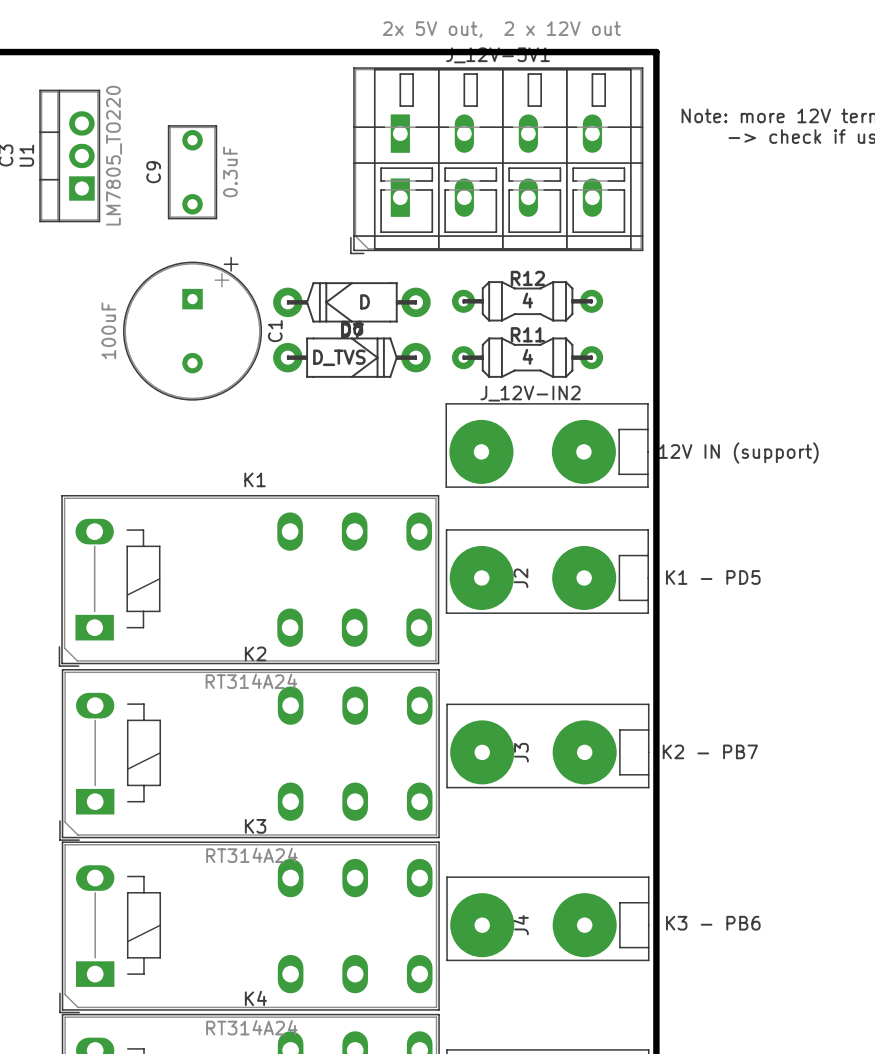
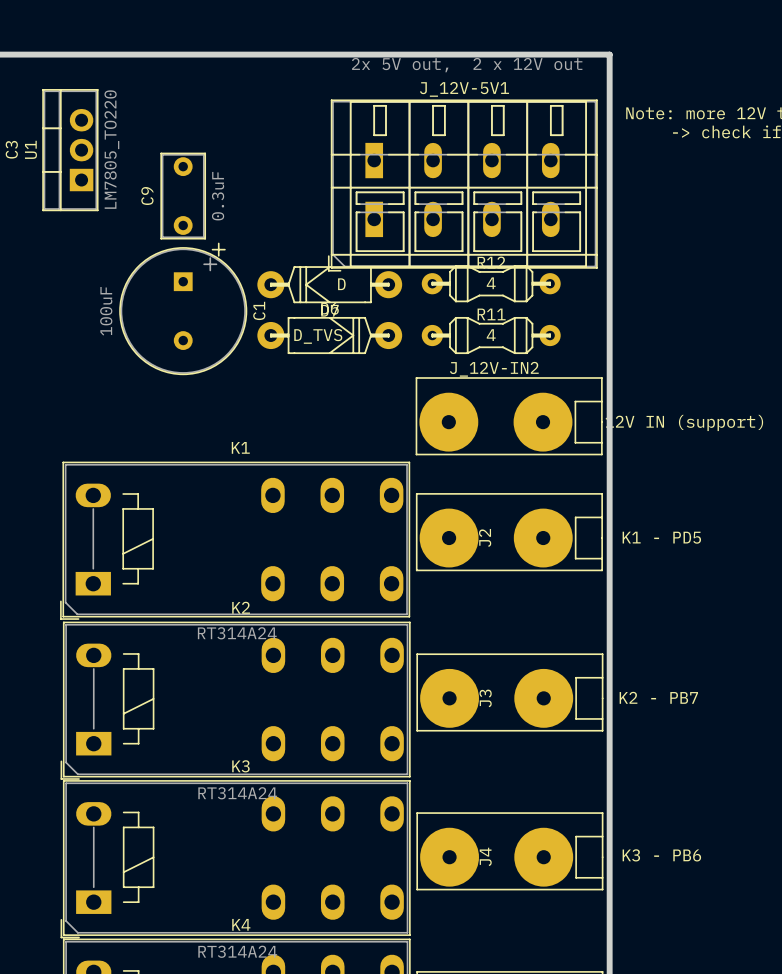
J_12V-5V1 position: (496, 160) -> (462, 185)
C9 position: (192, 172) -> (183, 196)

